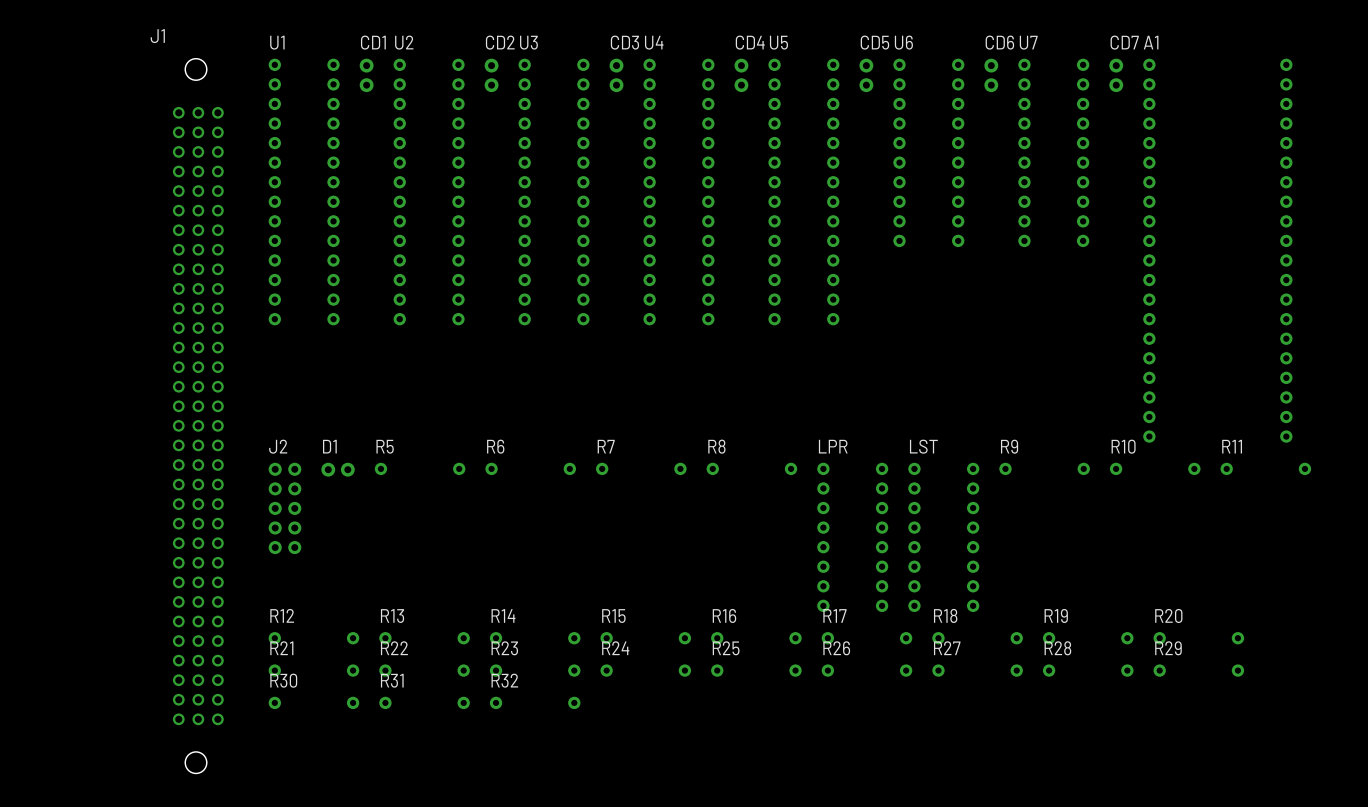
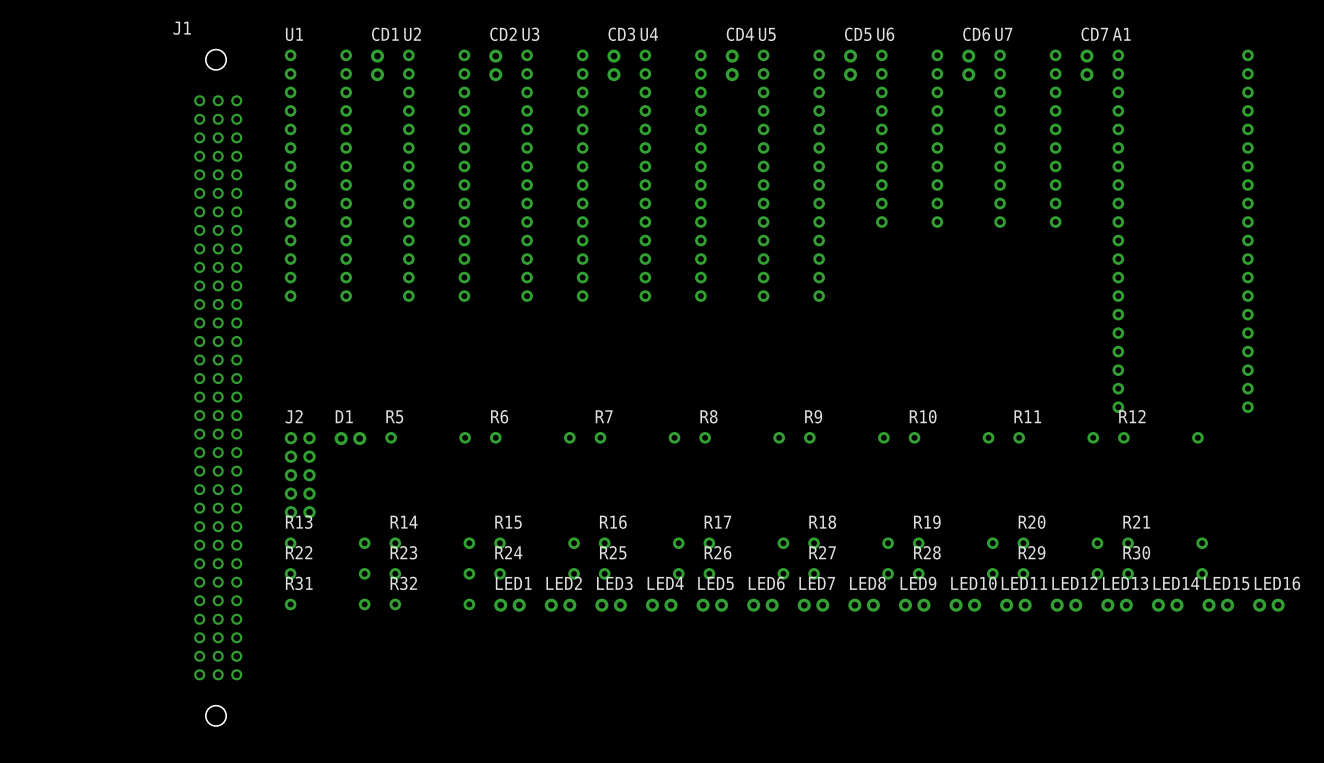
R9 position: (1044, 468) -> (846, 437)
R10 position: (1155, 468) -> (951, 437)
R11 position: (1265, 468) -> (1056, 437)
LPR: (852, 537) -> none
LST: (943, 537) -> none
R12 position: (313, 638) -> (1160, 437)
R13 position: (424, 638) -> (327, 543)
R14 position: (535, 638) -> (432, 543)
R15 position: (645, 638) -> (537, 543)
R16 position: (756, 638) -> (641, 543)
R17 position: (866, 638) -> (746, 543)
R18 position: (977, 638) -> (851, 543)
R19 position: (1088, 638) -> (955, 543)
R20 position: (1198, 638) -> (1060, 543)
LED1: none -> (509, 605)
LED2: none -> (560, 605)
LED3: none -> (611, 605)
LED4: none -> (661, 605)
LED5: none -> (712, 605)
LED6: none -> (762, 605)
LED7: none -> (813, 605)
LED8: none -> (864, 605)
LED9: none -> (914, 605)
LED10: none -> (965, 605)
LED11: none -> (1015, 605)
LED12: none -> (1066, 605)
LED13: none -> (1117, 605)
LED14: none -> (1167, 605)
LED15: none -> (1218, 605)
LED16: none -> (1268, 605)
R21 position: (313, 670) -> (1165, 543)
R22 position: (424, 670) -> (327, 573)
R23 position: (535, 670) -> (432, 573)
R24 position: (645, 670) -> (537, 573)
R25 position: (756, 670) -> (641, 573)
R26 position: (866, 670) -> (746, 573)
R27 position: (977, 670) -> (851, 573)
R28 position: (1088, 670) -> (955, 573)
R29 position: (1198, 670) -> (1060, 573)
R30 position: (313, 702) -> (1165, 573)
R31 position: (424, 702) -> (327, 604)
R32 position: (535, 702) -> (432, 604)

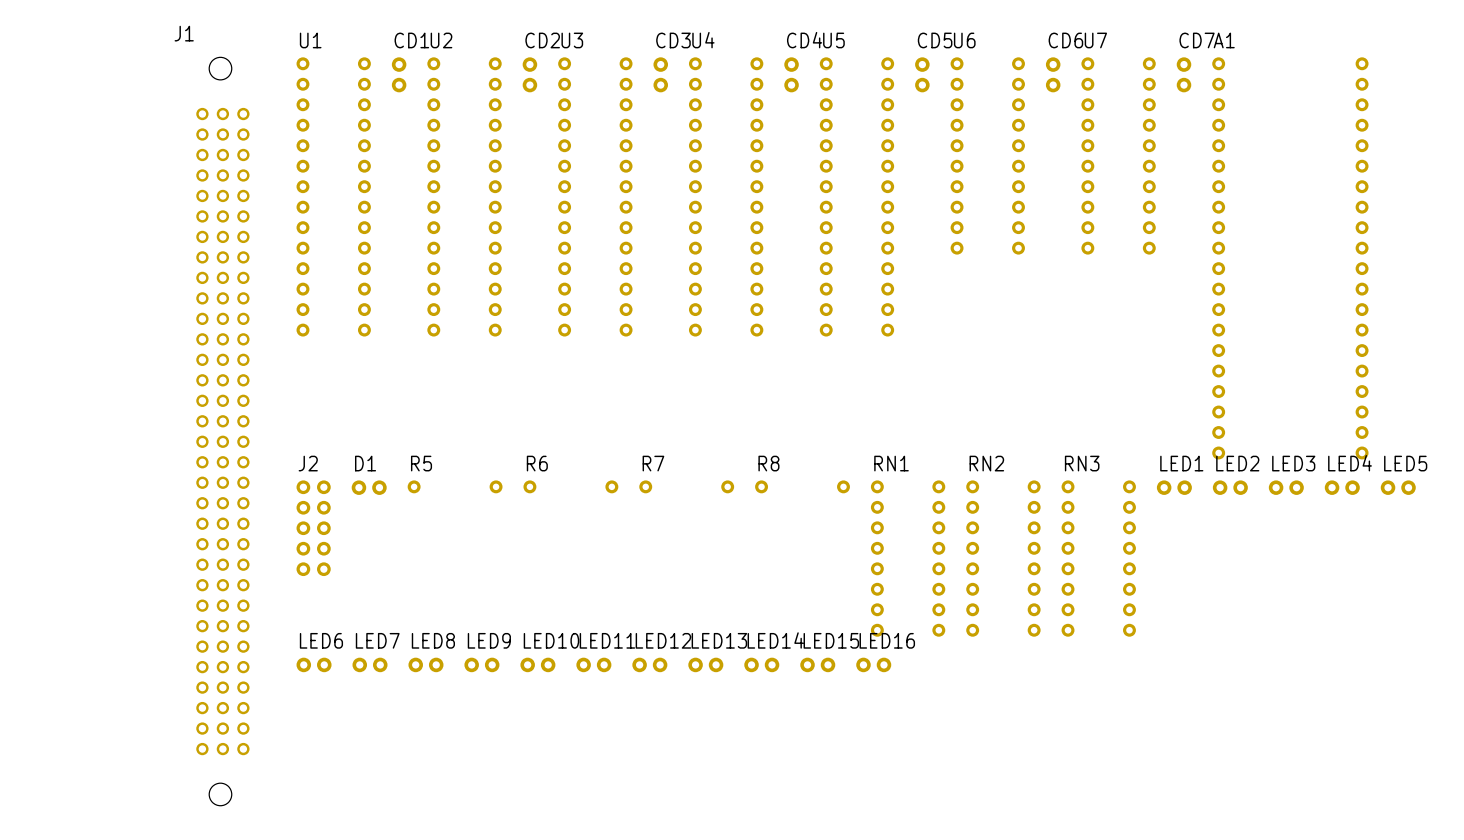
R9: (846, 437) -> none
R10: (951, 437) -> none
R11: (1056, 437) -> none
R12: (1160, 437) -> none
RN1: none -> (908, 558)
RN2: none -> (1003, 558)
RN3: none -> (1098, 558)
R13: (327, 543) -> none
R14: (432, 543) -> none
R15: (537, 543) -> none
R16: (641, 543) -> none
R17: (746, 543) -> none
R18: (851, 543) -> none
R19: (955, 543) -> none
R20: (1060, 543) -> none
R21: (1165, 543) -> none
R22: (327, 573) -> none
R23: (432, 573) -> none
R24: (537, 573) -> none
R25: (641, 573) -> none
R26: (746, 573) -> none
R27: (851, 573) -> none
R28: (955, 573) -> none
R29: (1060, 573) -> none
R30: (1165, 573) -> none
R31: (327, 604) -> none
R32: (432, 604) -> none
LED1 position: (509, 605) -> (1174, 487)
LED2 position: (560, 605) -> (1230, 487)
LED3 position: (611, 605) -> (1286, 487)
LED4 position: (661, 605) -> (1342, 487)
LED5 position: (712, 605) -> (1398, 487)
LED6 position: (762, 605) -> (314, 664)
LED7 position: (813, 605) -> (370, 664)
LED8 position: (864, 605) -> (425, 664)
LED9 position: (914, 605) -> (481, 664)
LED10 position: (965, 605) -> (537, 664)
LED11 position: (1015, 605) -> (593, 664)
LED12 position: (1066, 605) -> (649, 664)
LED13 position: (1117, 605) -> (705, 664)
LED14 position: (1167, 605) -> (761, 664)
LED15 position: (1218, 605) -> (817, 664)
LED16 position: (1268, 605) -> (873, 664)

